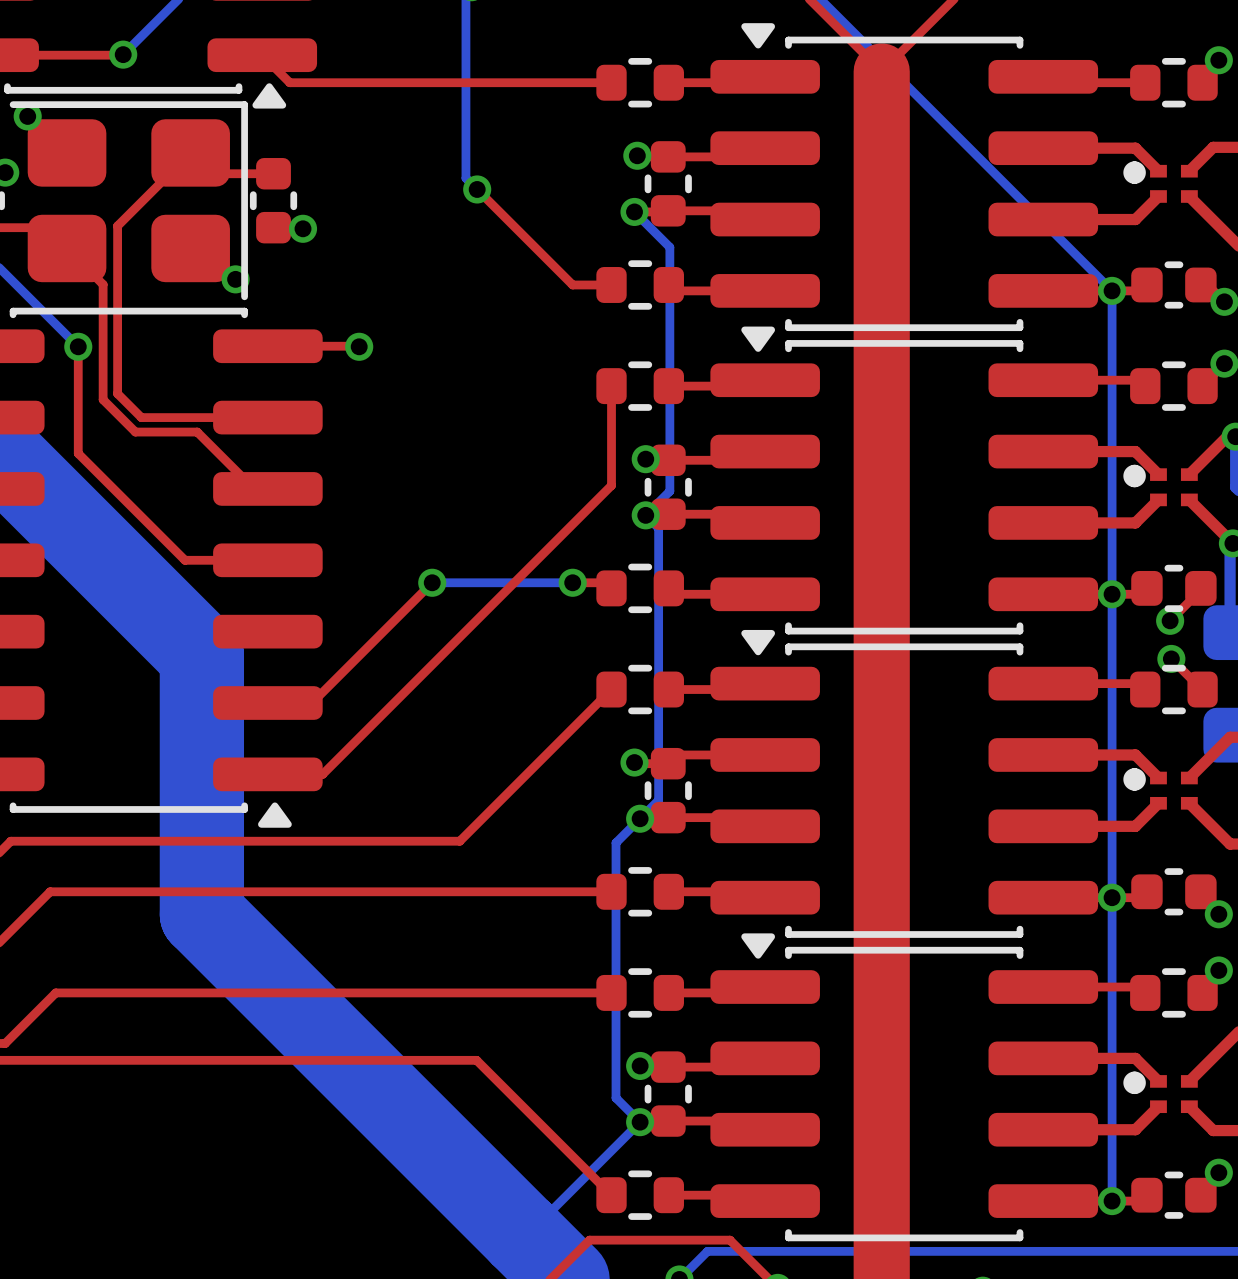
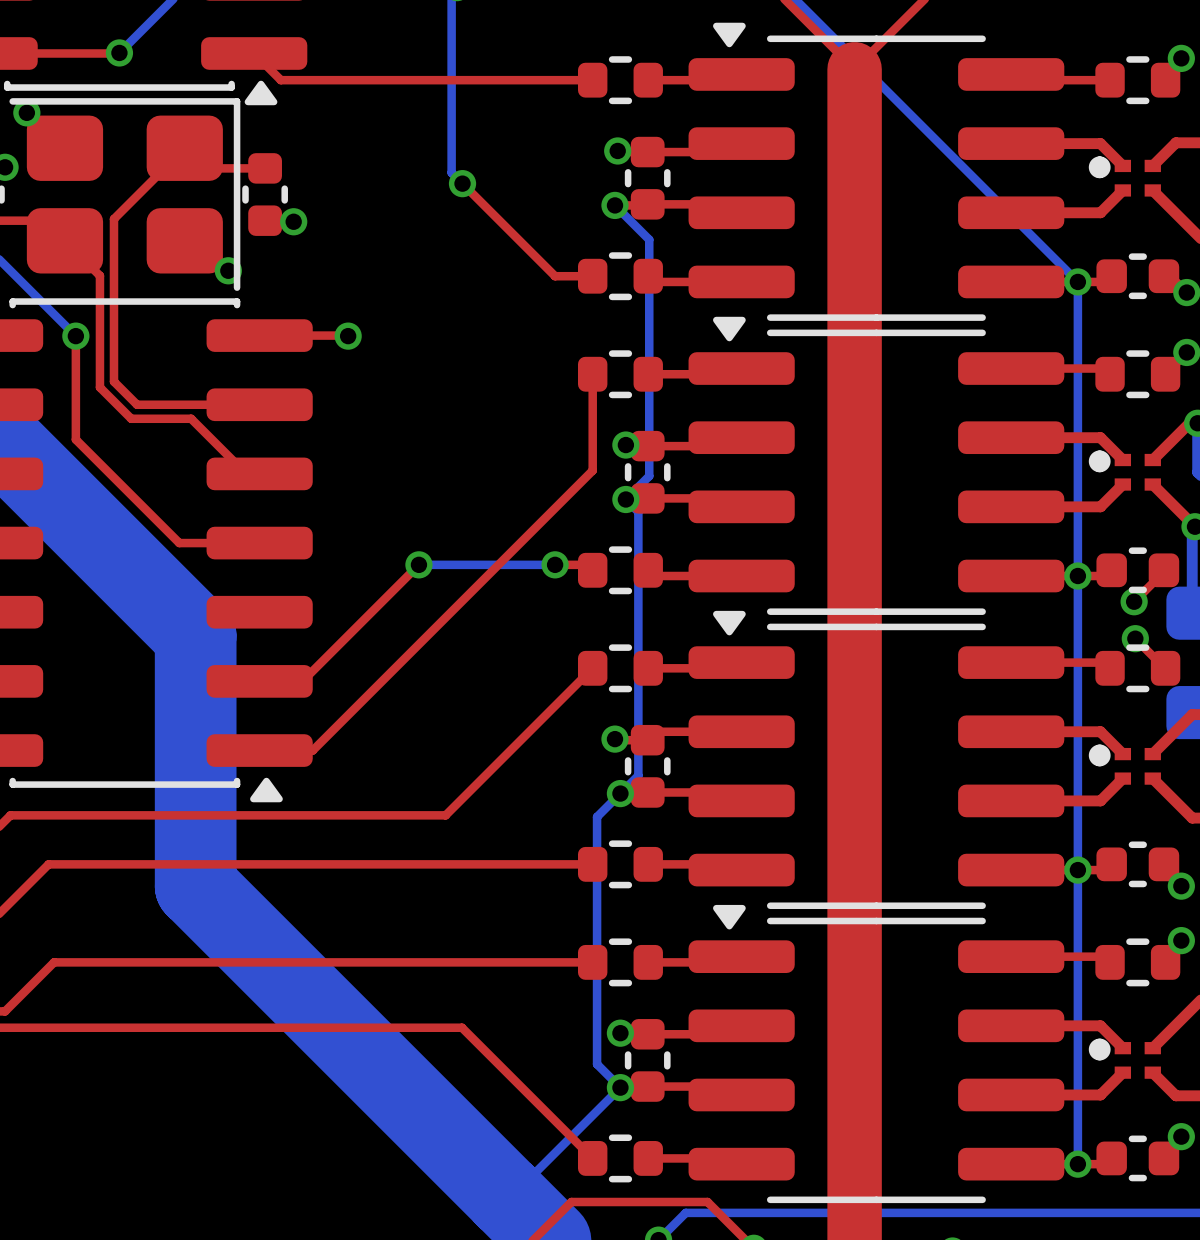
part footprint: [710, 23, 1099, 332] -> [688, 22, 1065, 321]
part footprint: [710, 326, 1099, 635] -> [688, 316, 1065, 615]
part footprint: [710, 629, 1099, 938] -> [688, 610, 1065, 910]
part footprint: [710, 933, 1099, 1242] -> [688, 904, 1065, 1204]

